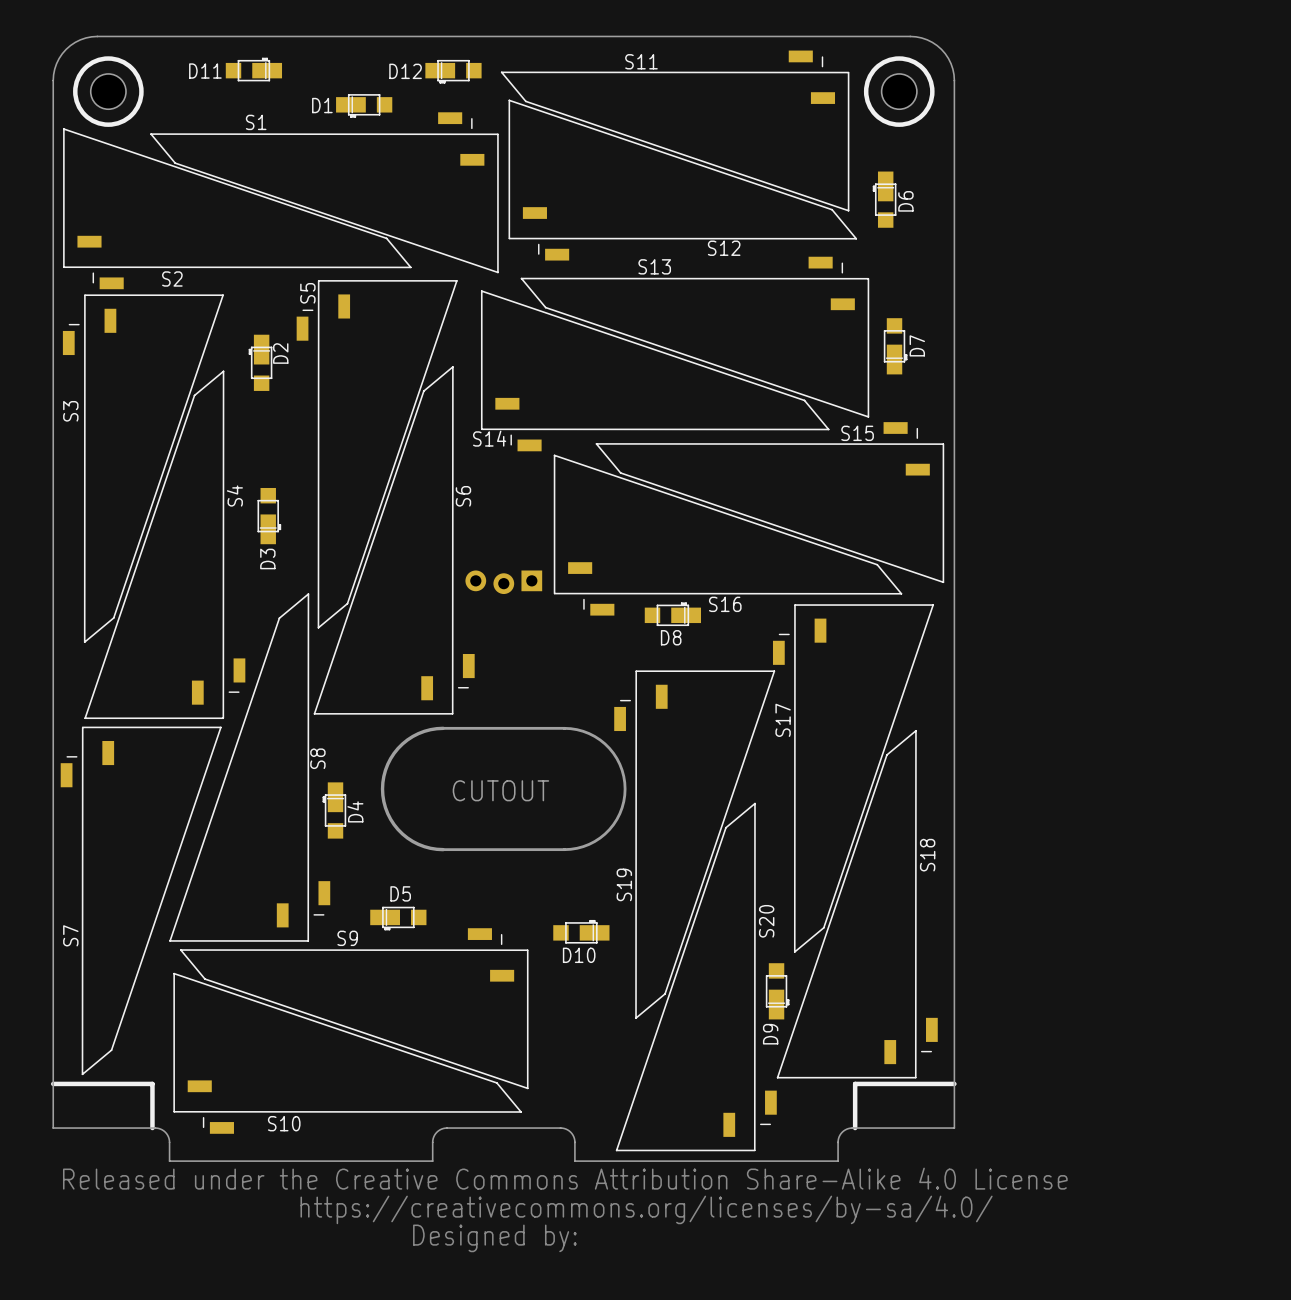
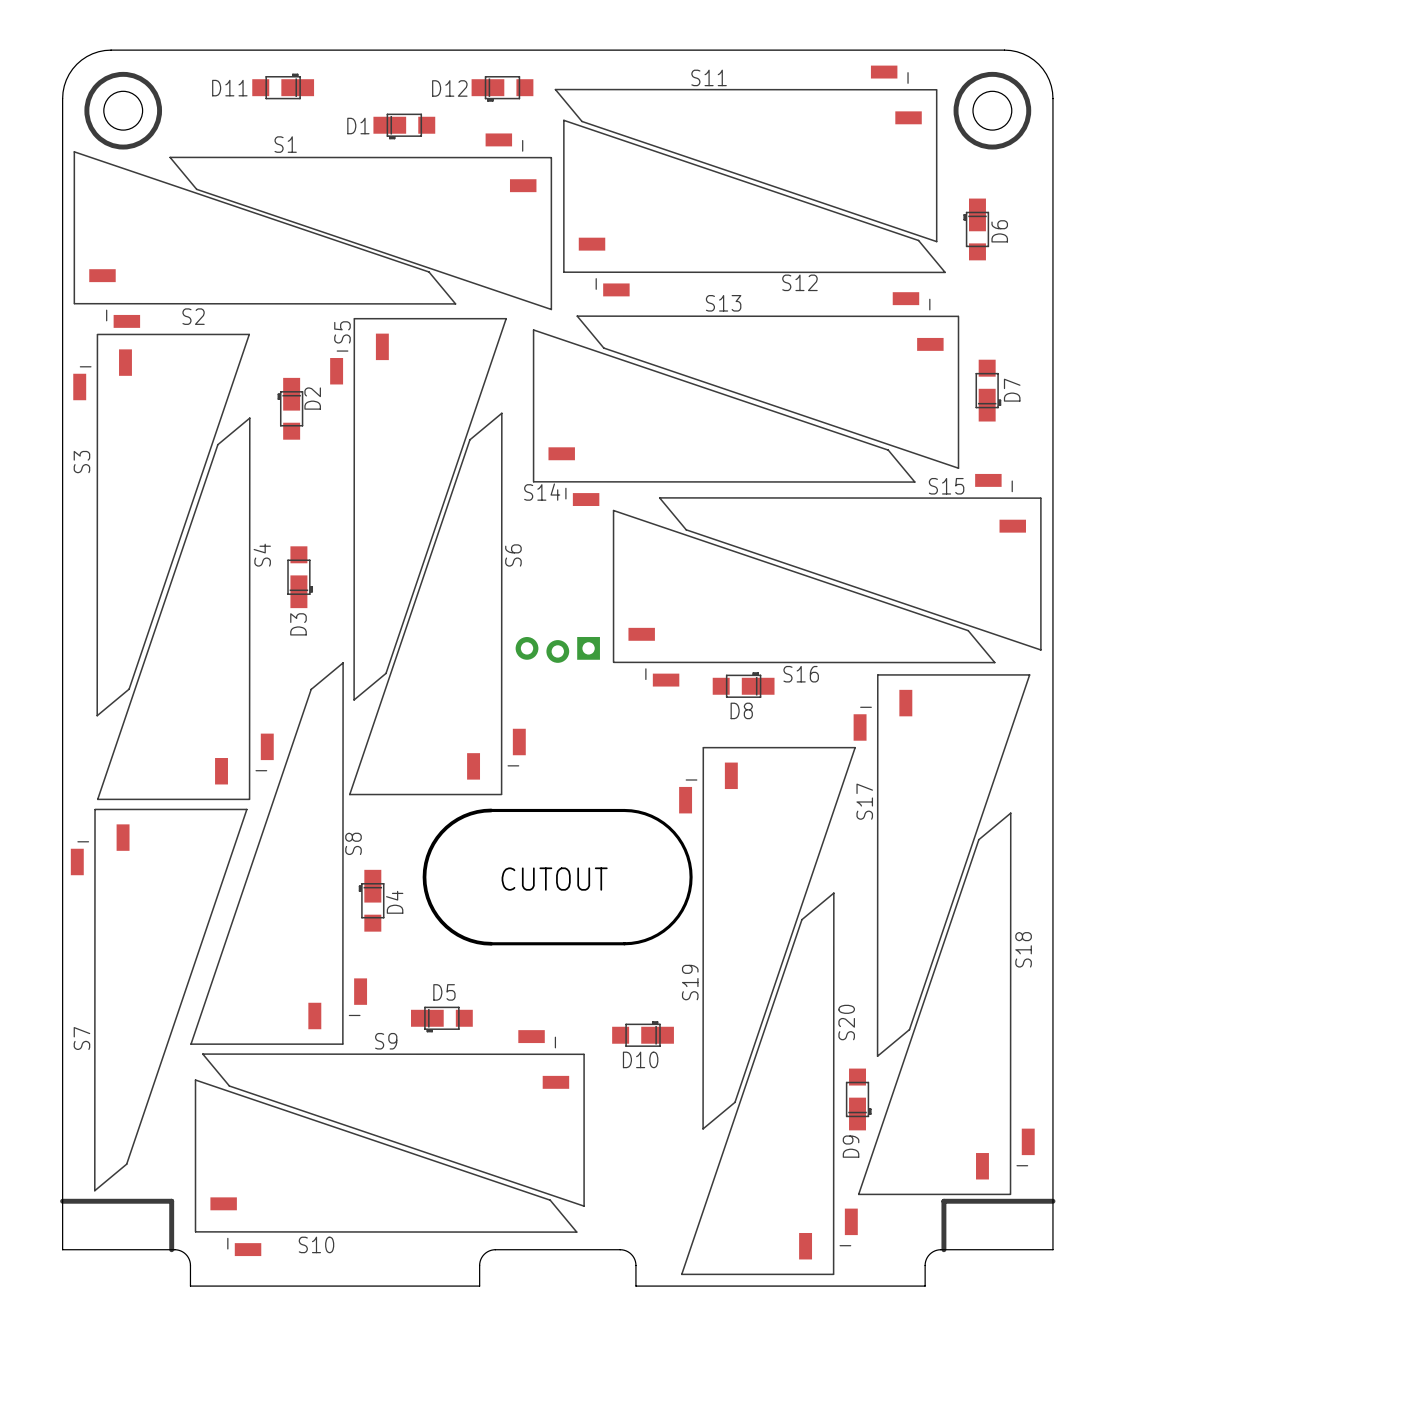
drawing: [62, 1167, 1068, 1253] -> none

